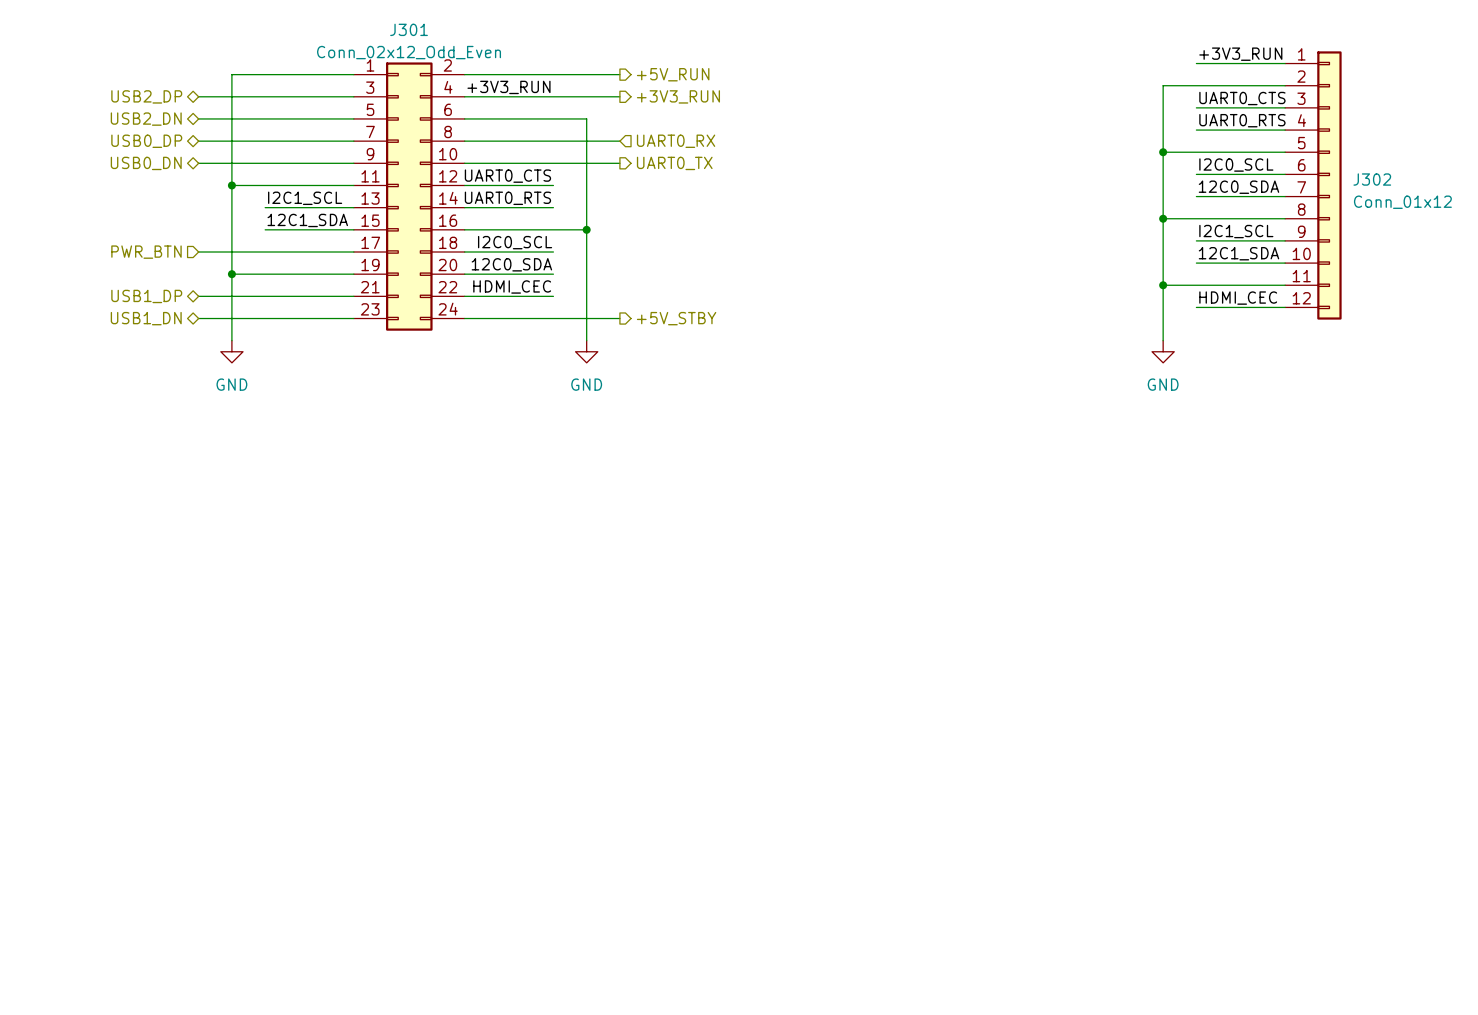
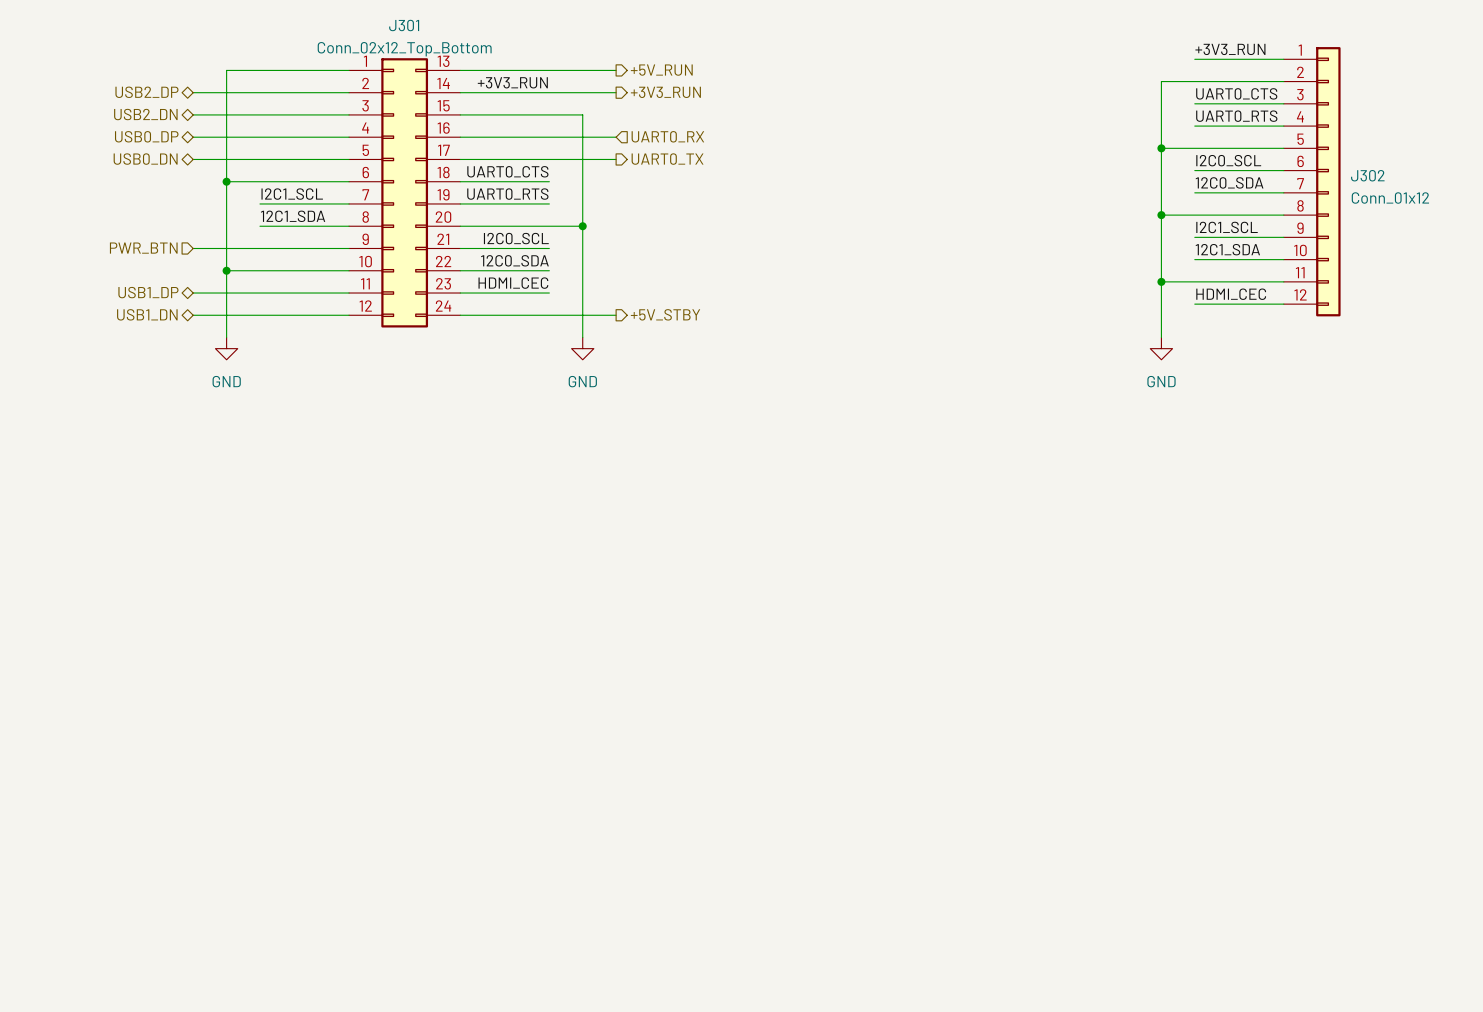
J301 value: Conn_02x12_Odd_Even (409, 52) -> Conn_02x12_Top_Bottom (404, 49)
J301 symbol: [353, 62, 465, 331] -> [349, 58, 461, 328]

